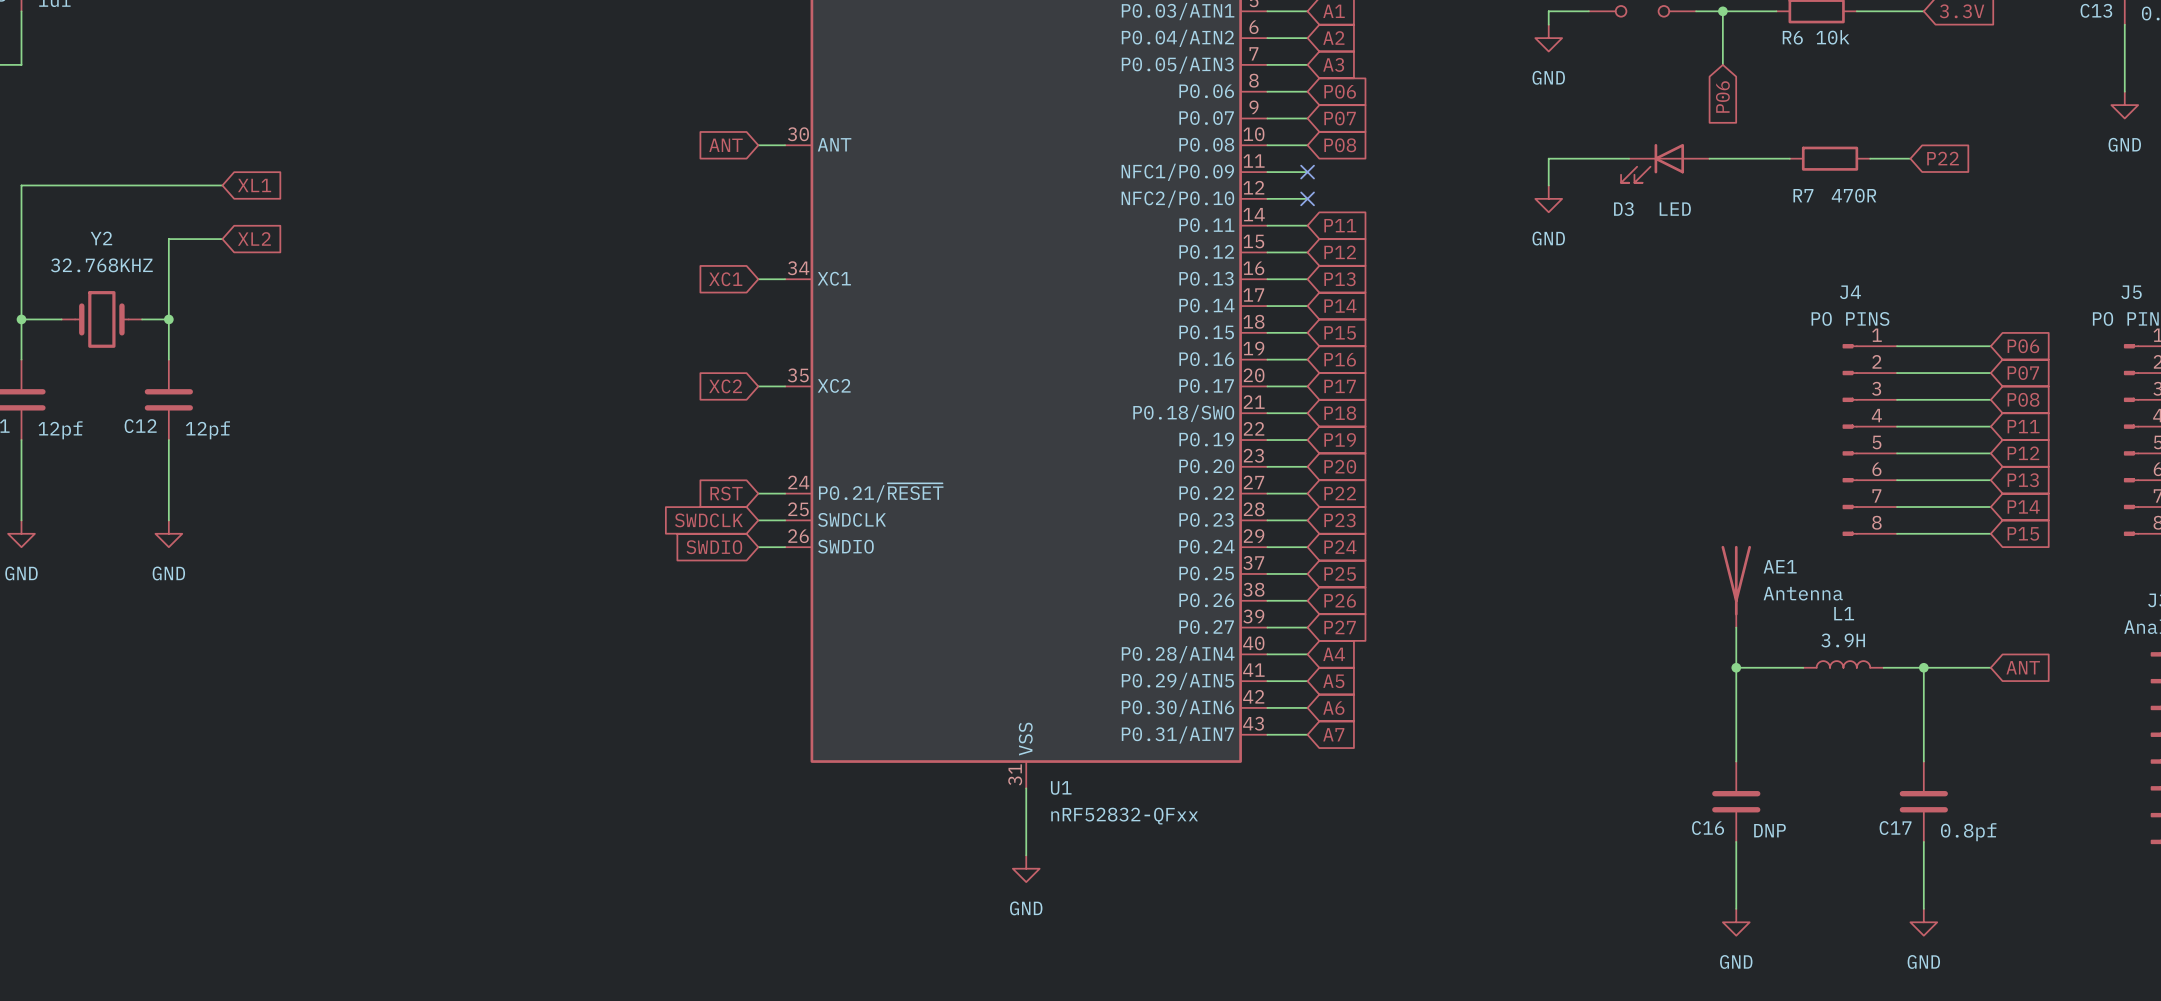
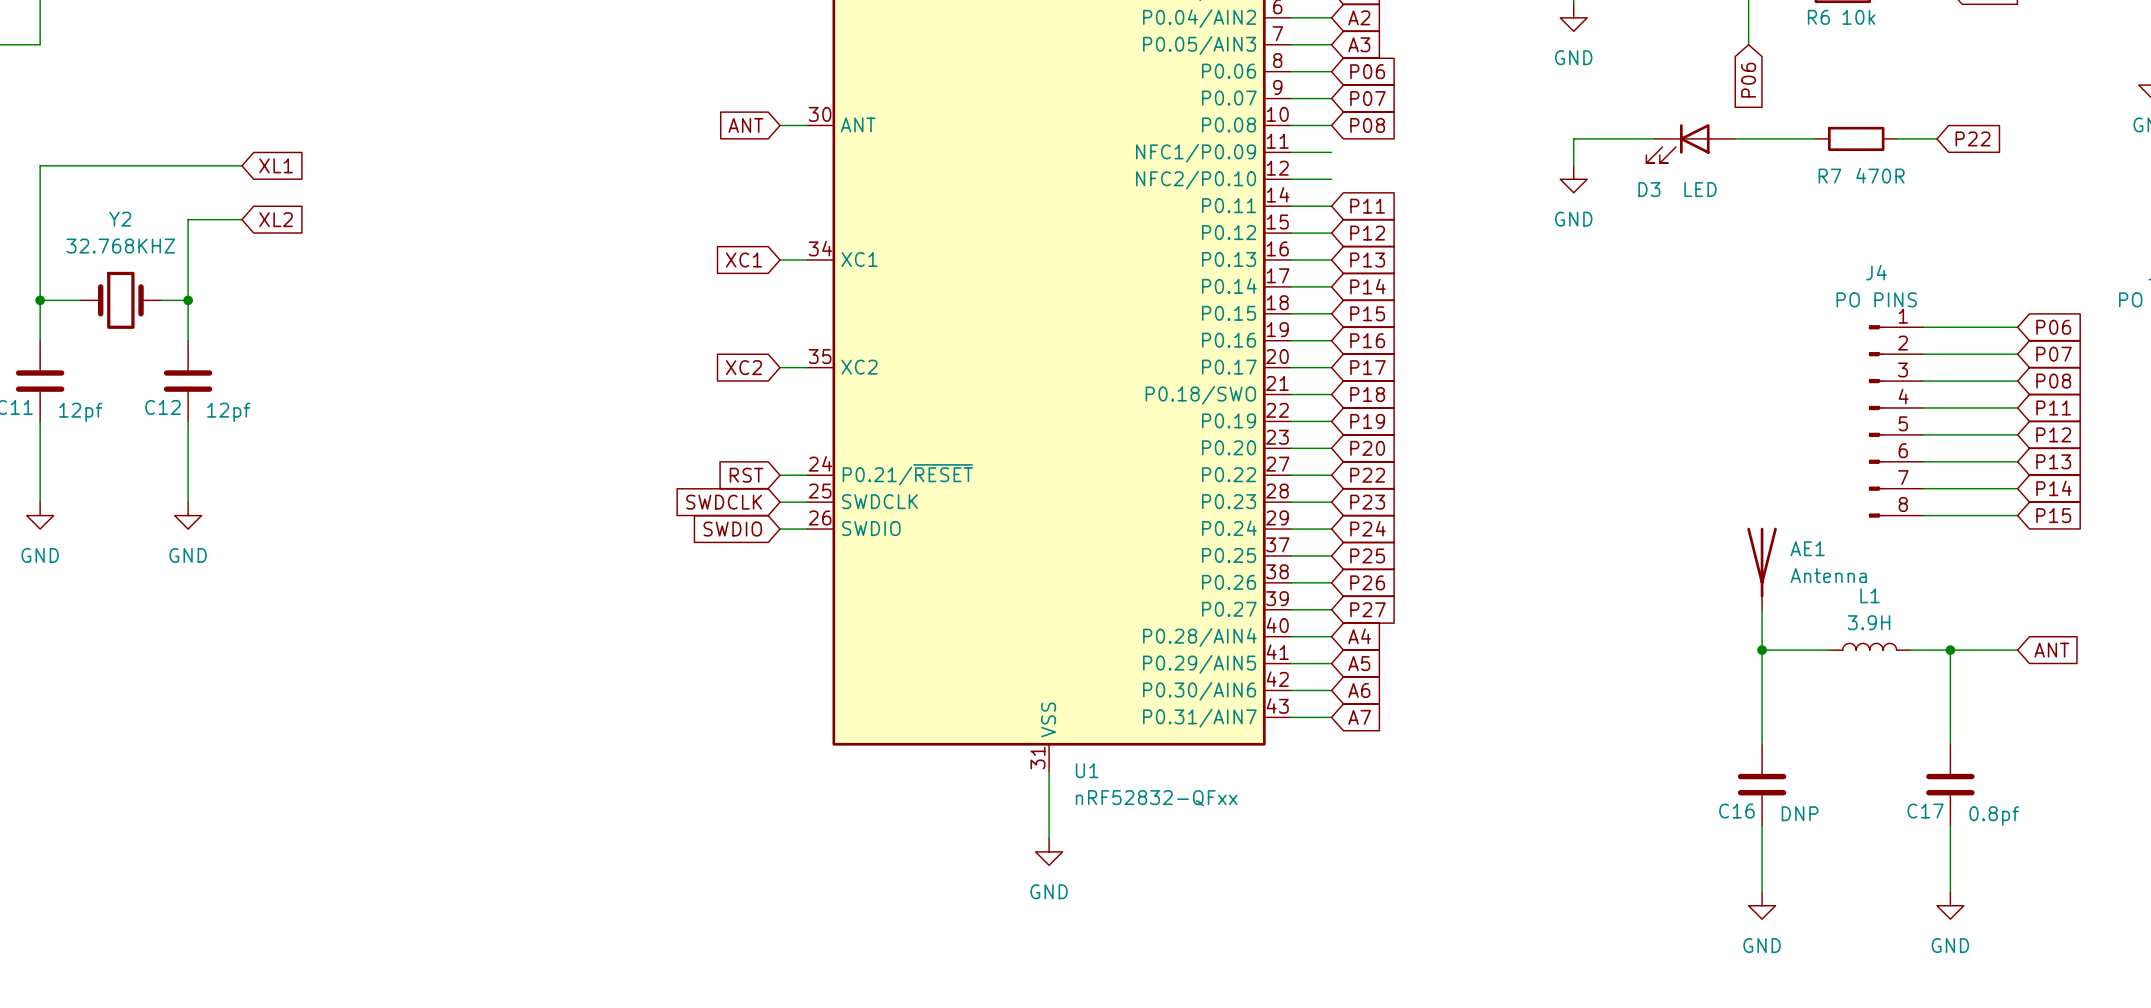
no-connect mark: (1307, 172) -> none
no-connect mark: (1307, 198) -> none

